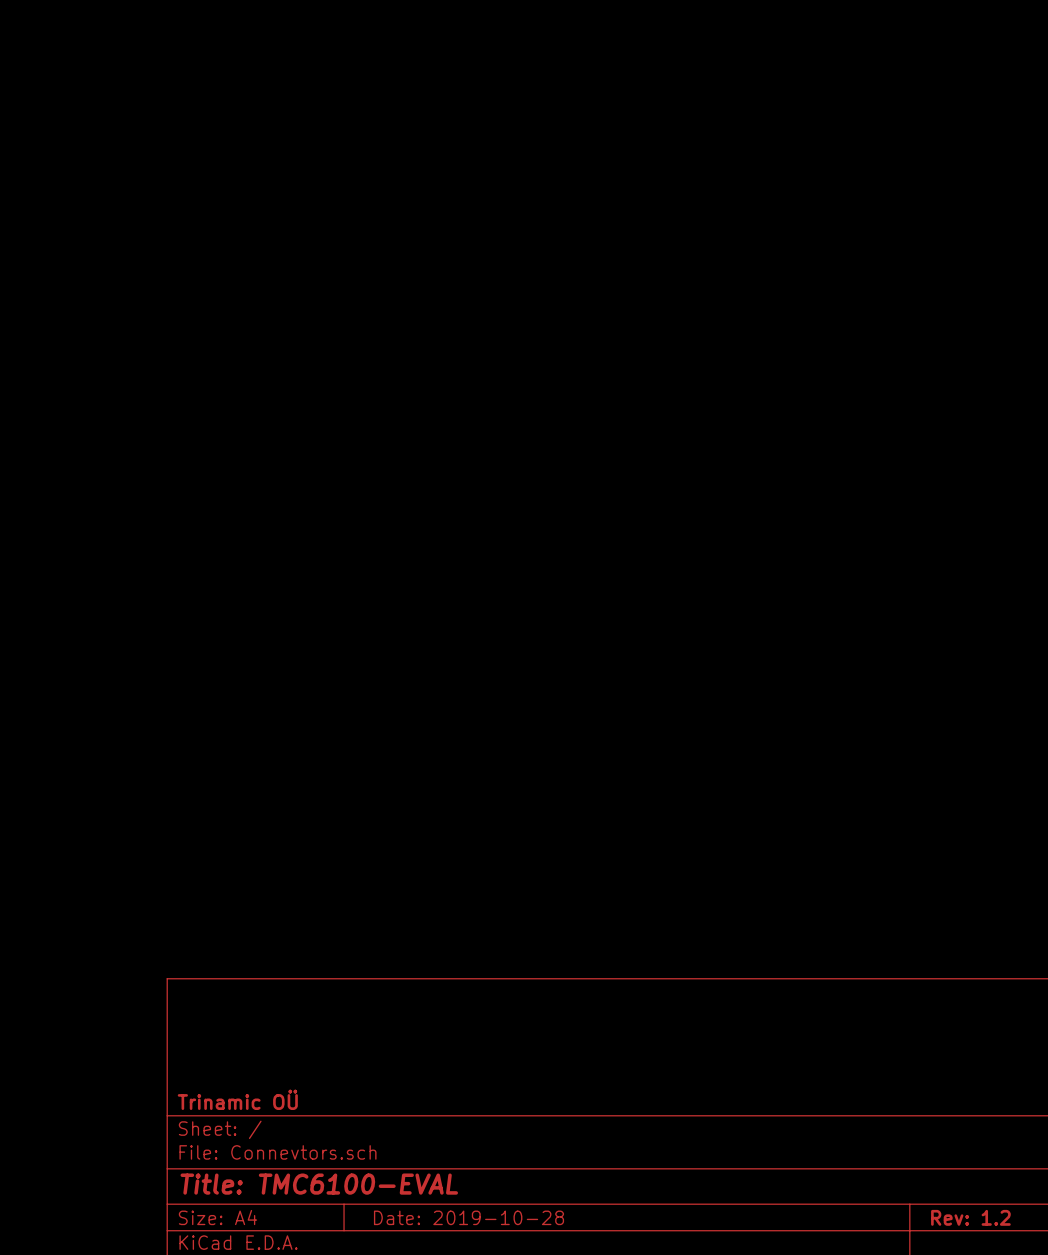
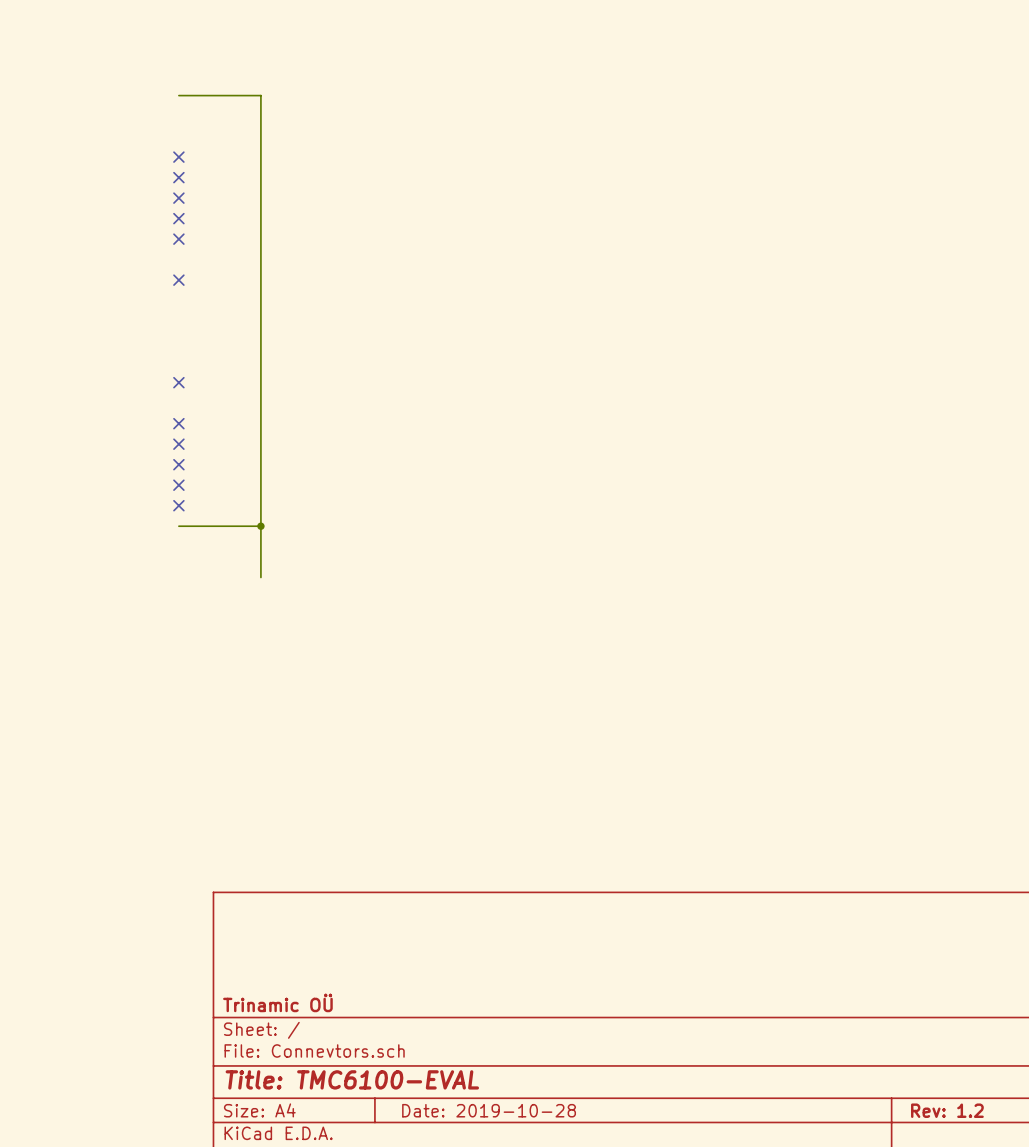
wire: none -> (178, 95) (260, 95) (260, 577)
no-connect mark: none -> (178, 157)
no-connect mark: none -> (178, 177)
no-connect mark: none -> (178, 198)
no-connect mark: none -> (178, 218)
no-connect mark: none -> (178, 239)
no-connect mark: none -> (178, 280)
no-connect mark: none -> (178, 382)
no-connect mark: none -> (178, 423)
no-connect mark: none -> (178, 444)
no-connect mark: none -> (178, 464)
no-connect mark: none -> (178, 485)
no-connect mark: none -> (178, 505)
wire: none -> (178, 526) (260, 526)
junction: none -> (260, 526)

